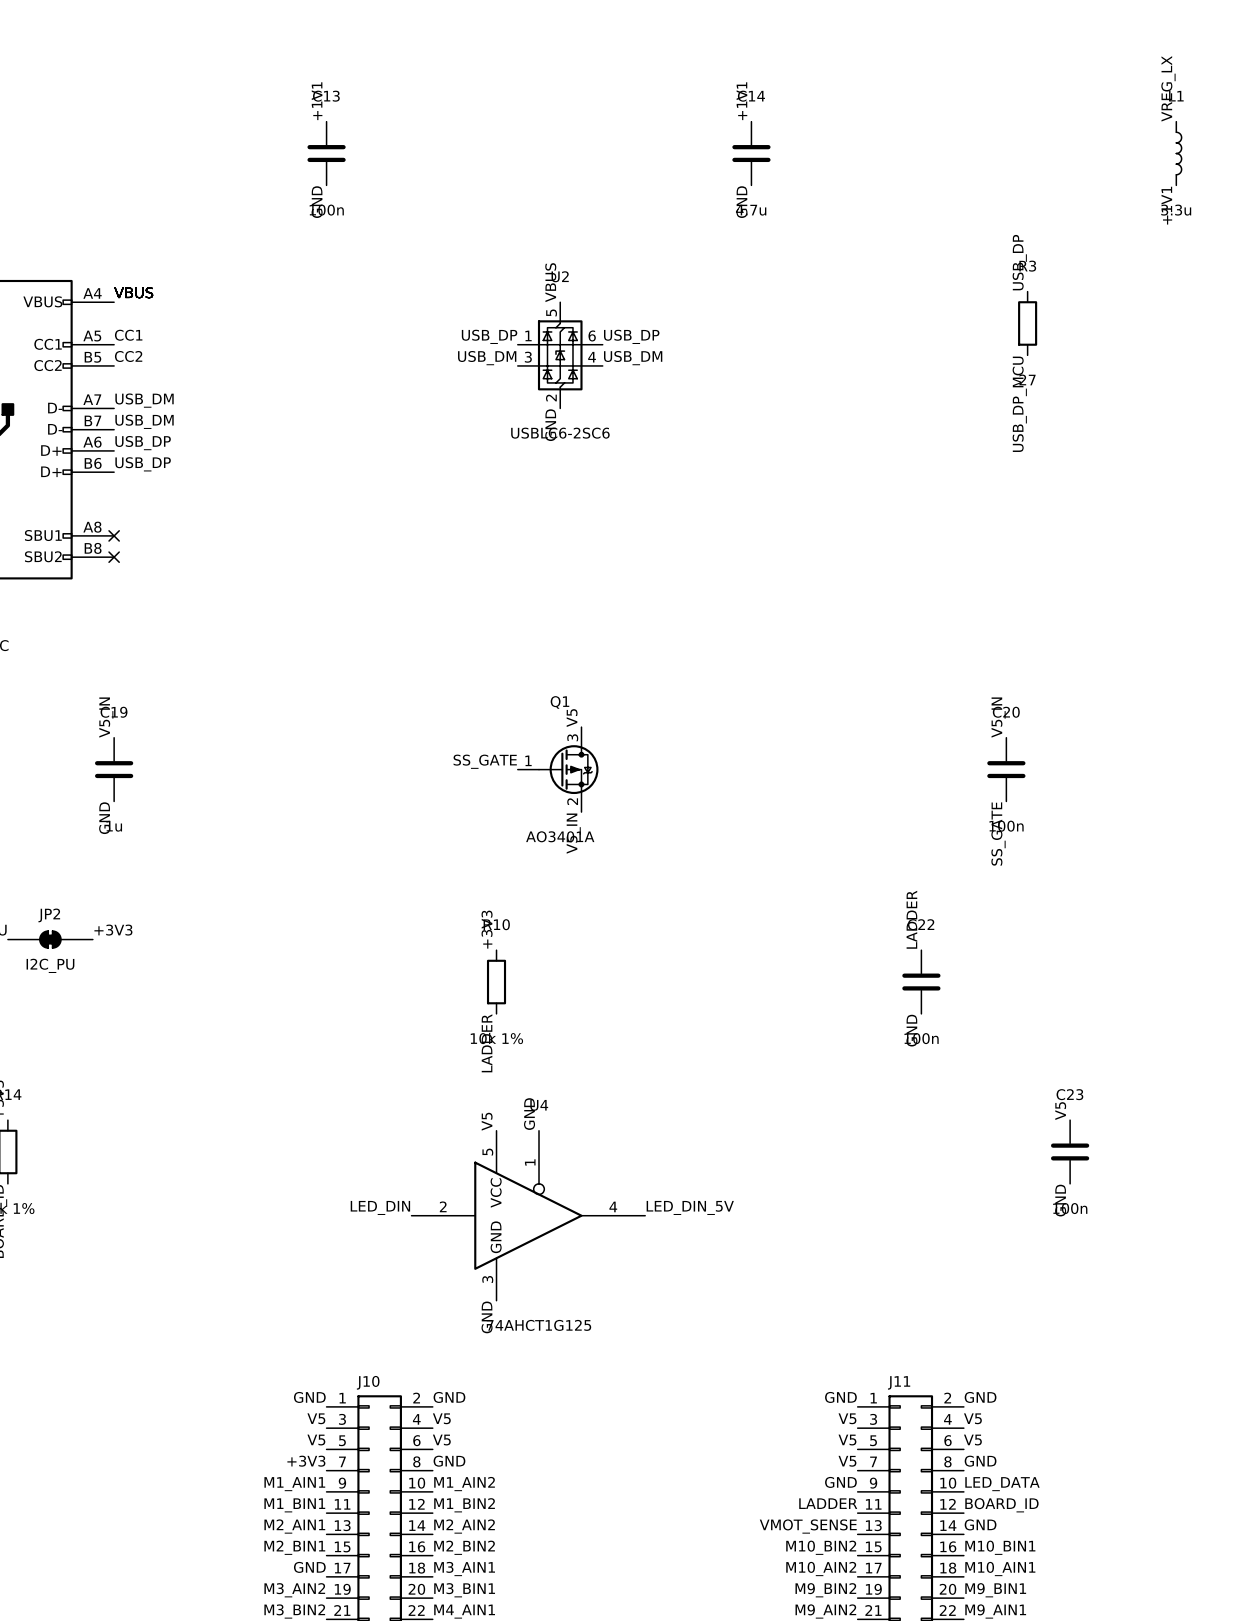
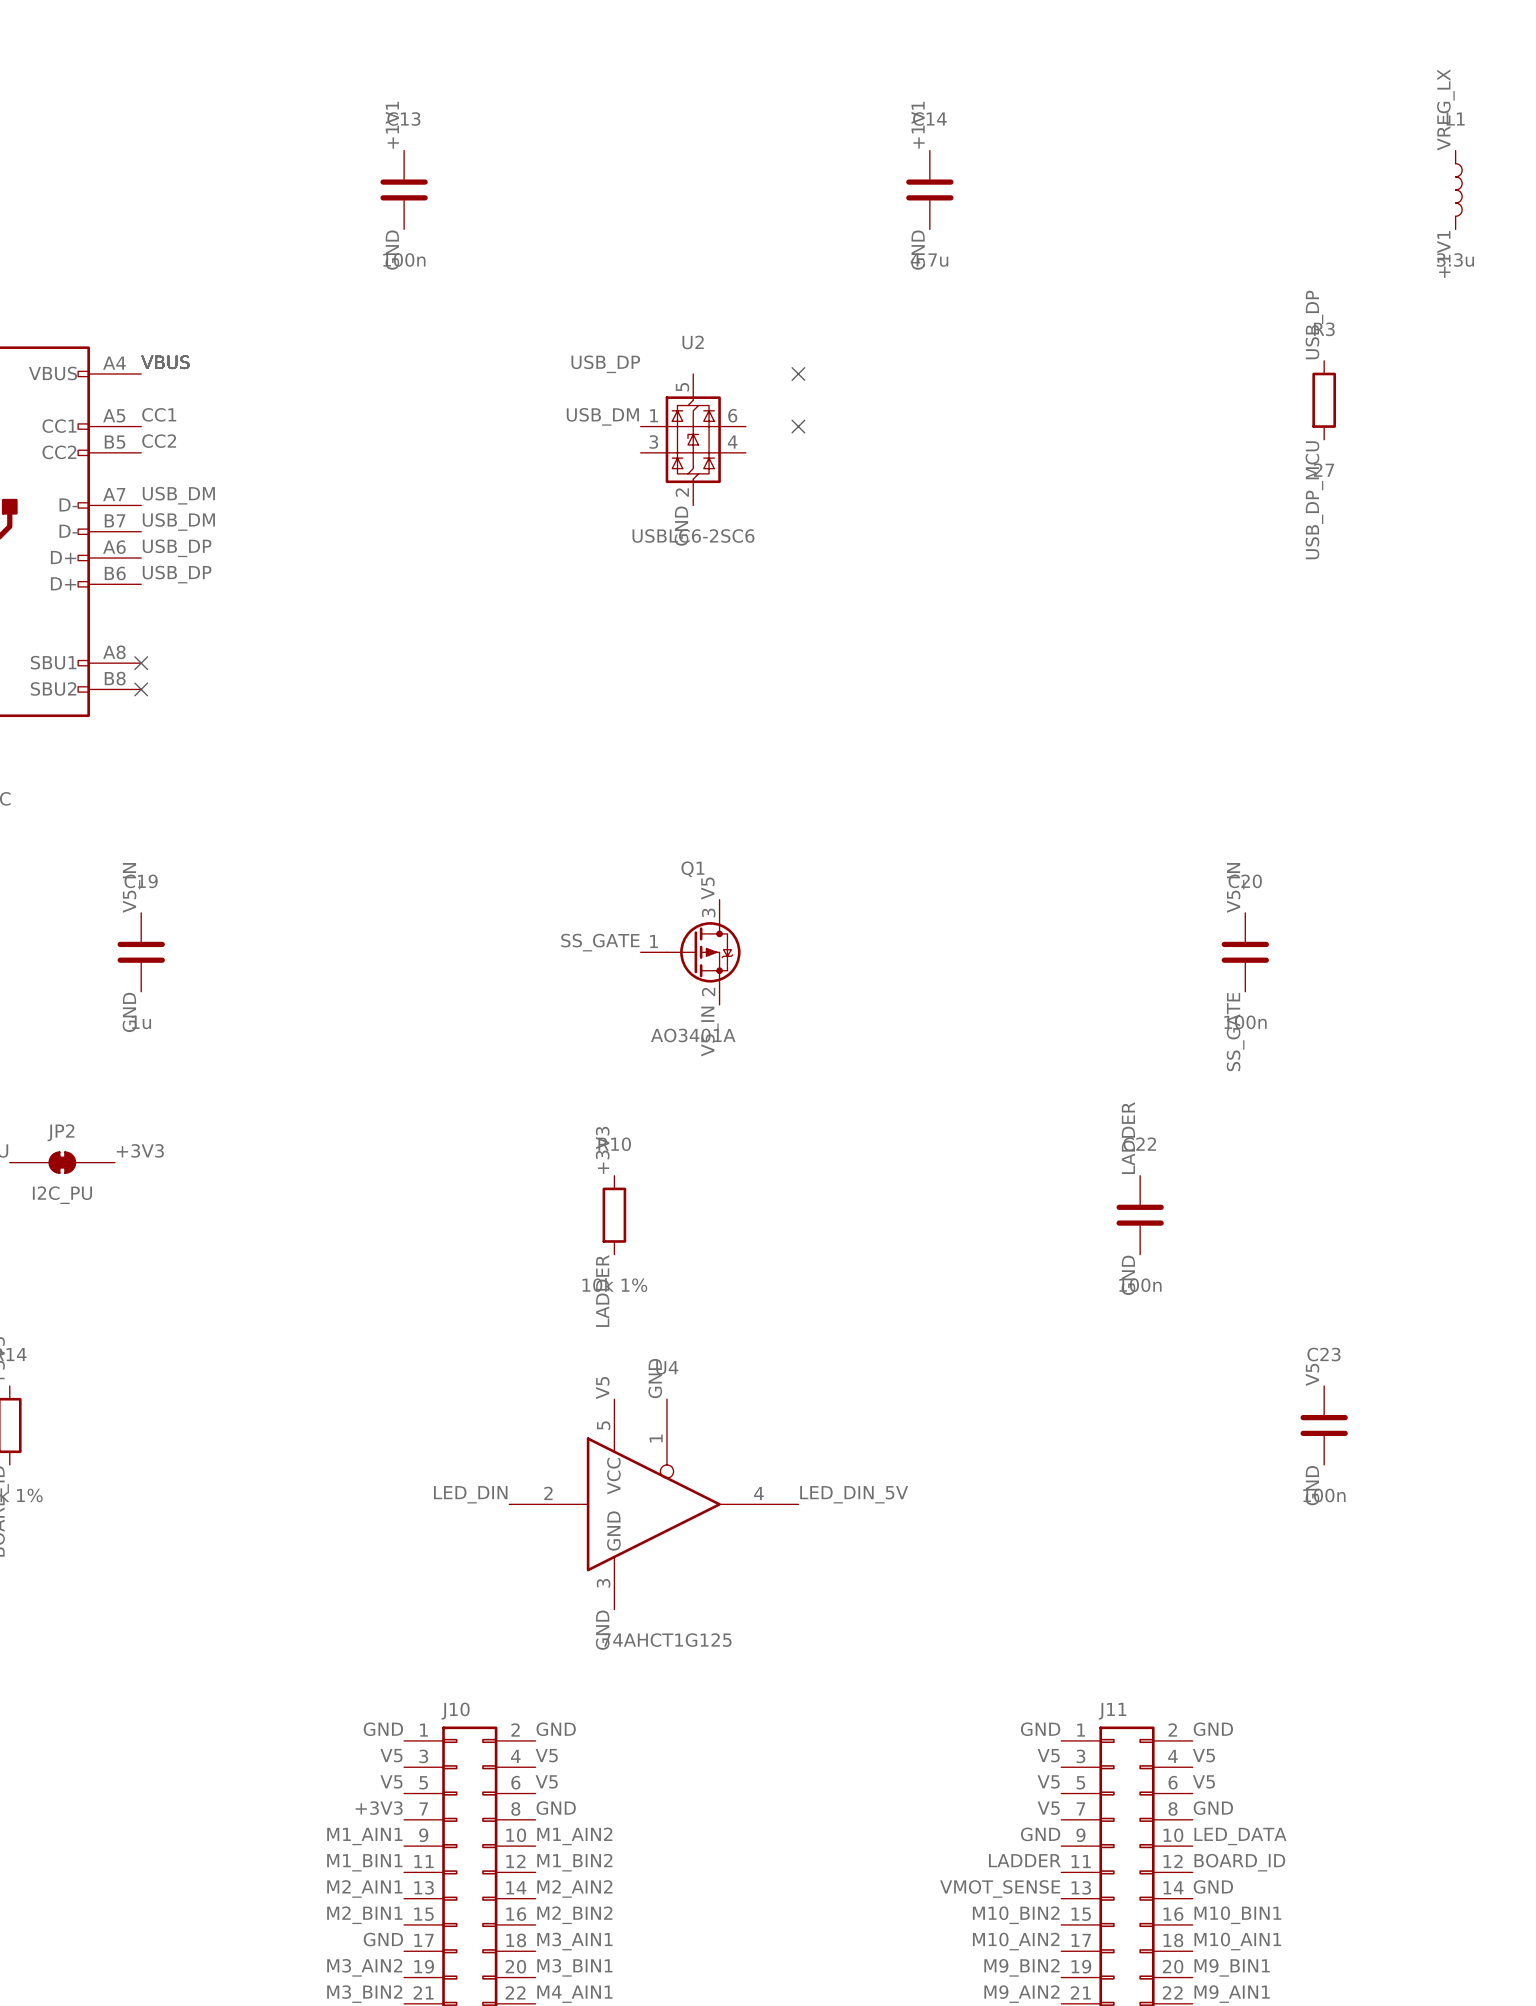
label position: USB_DP (1019, 262) -> USB_DP (1314, 324)
label: VBUS (550, 282) -> none
no-connect mark: none -> (798, 373)
R3 position: (1027, 323) -> (1324, 400)
label: USB_DP (489, 336) -> USB_DM (602, 416)
label position: USB_DP (631, 336) -> USB_DP (605, 364)
no-connect mark: none -> (798, 426)
label: USB_DM (487, 358) -> none
label: USB_DM (633, 358) -> none
label position: USB_DP_MCU (1019, 404) -> USB_DP_MCU (1314, 500)

